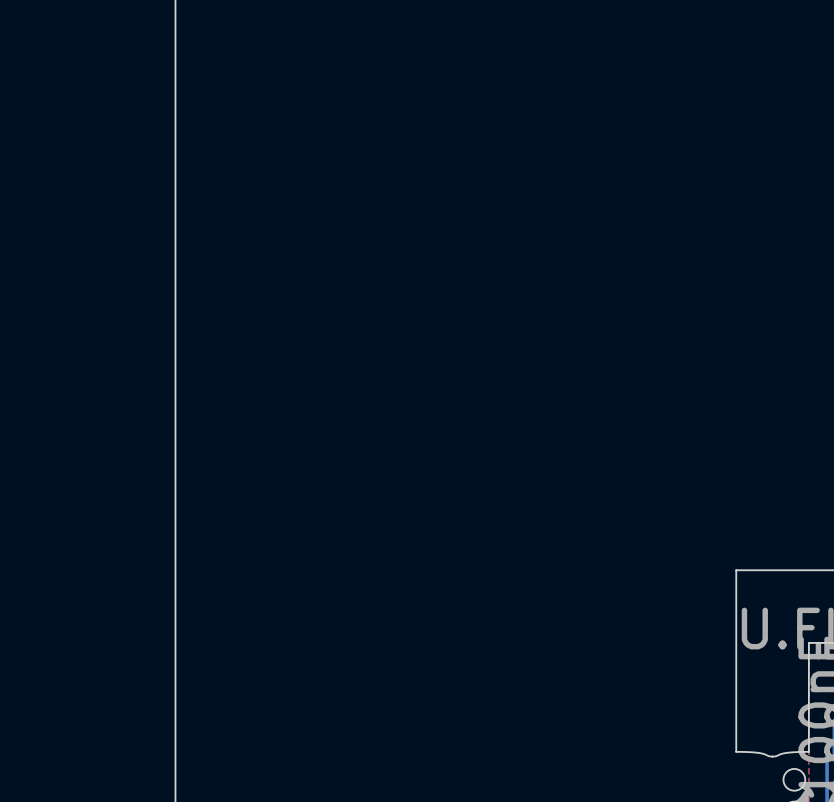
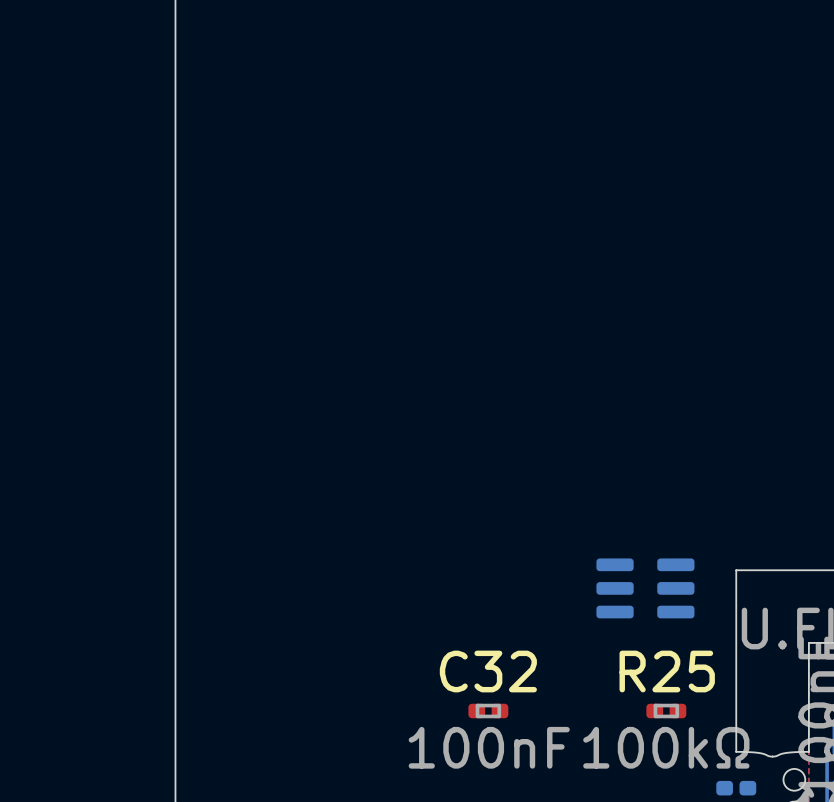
part: none -> (645, 588)
C32: none -> 100nF (488, 711)
R25: none -> 100kΩ (666, 711)
part: none -> (736, 788)

